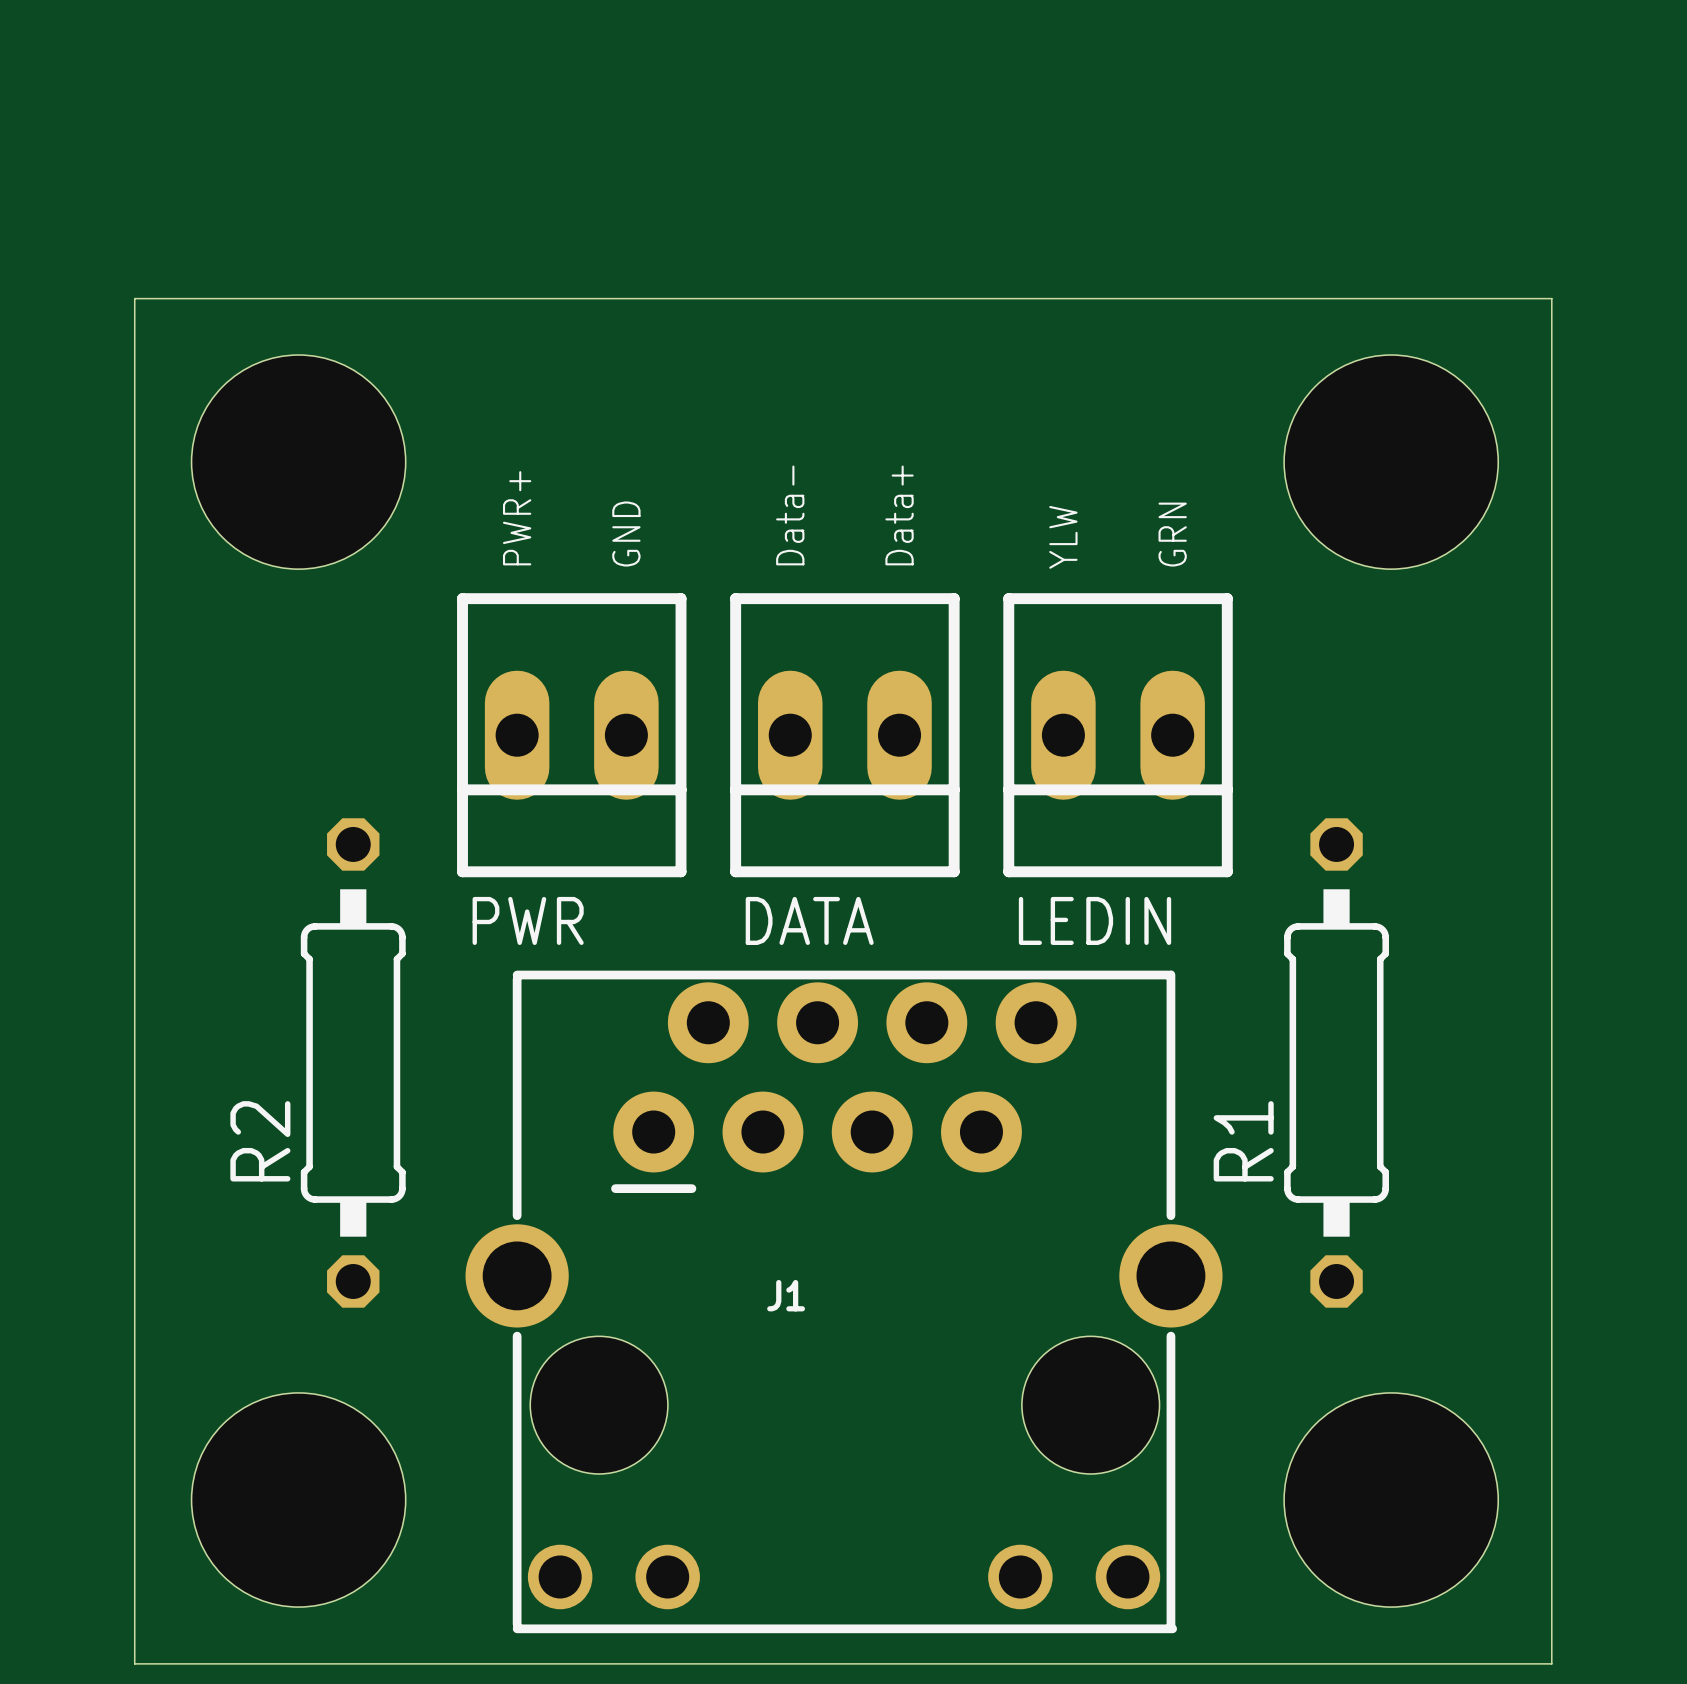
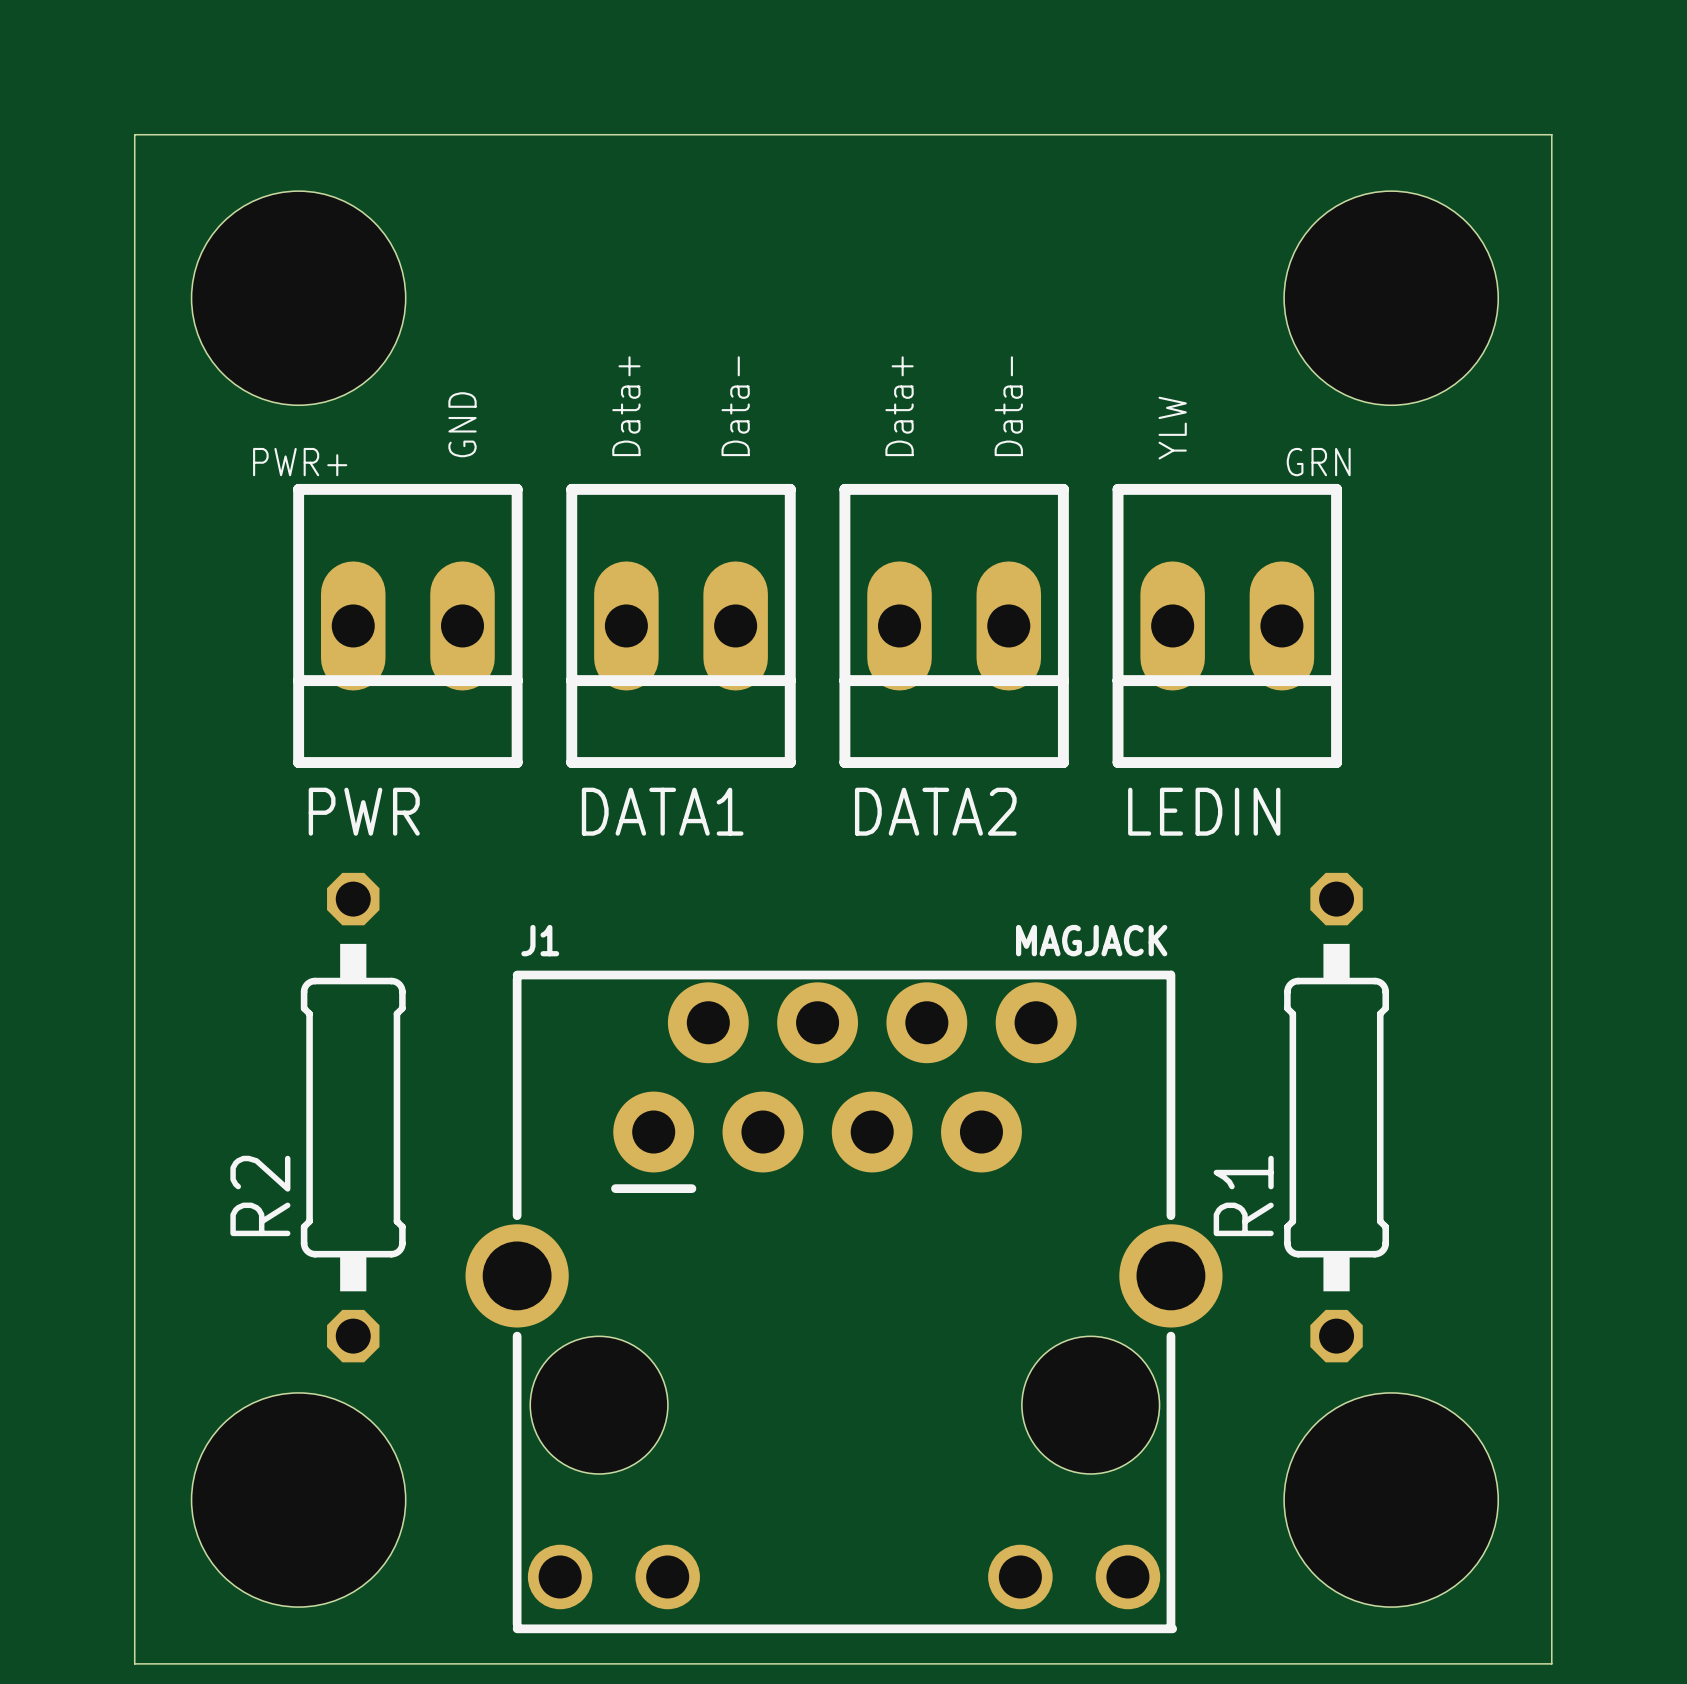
board edge: (134, 298) (1551, 298) -> (134, 298) (134, 134) (1551, 134) (1551, 298)
text: none -> Data+ (626, 406)
text: none -> Data- (1008, 406)
hole position: (298, 462) -> (298, 298)
hole position: (1391, 462) -> (1391, 298)
text position: Data- (790, 515) -> Data- (735, 406)
text position: Data+ (899, 515) -> Data+ (899, 406)
text rotation: 0° (517, 518) -> 90° clockwise (300, 462)
text position: PWR+ (517, 518) -> PWR+ (300, 462)
text position: GND (626, 533) -> GND (462, 424)
text rotation: 0° (1172, 534) -> 90° clockwise (1318, 462)
text position: GRN (1172, 534) -> GRN (1318, 462)
text position: YLW (1063, 537) -> YLW (1172, 428)
DATA1: none -> (681, 625)
DATA2: none -> (954, 625)
PWR position: (571, 735) -> (407, 625)
DATA: (844, 735) -> none
LEDIN position: (1118, 735) -> (1227, 625)
J1 value: none -> MAGJACK (1091, 940)
R2 position: (353, 1062) -> (353, 1117)
R1 position: (1336, 1062) -> (1336, 1117)
J1 name position: J1 (786, 1295) -> J1 (540, 940)

